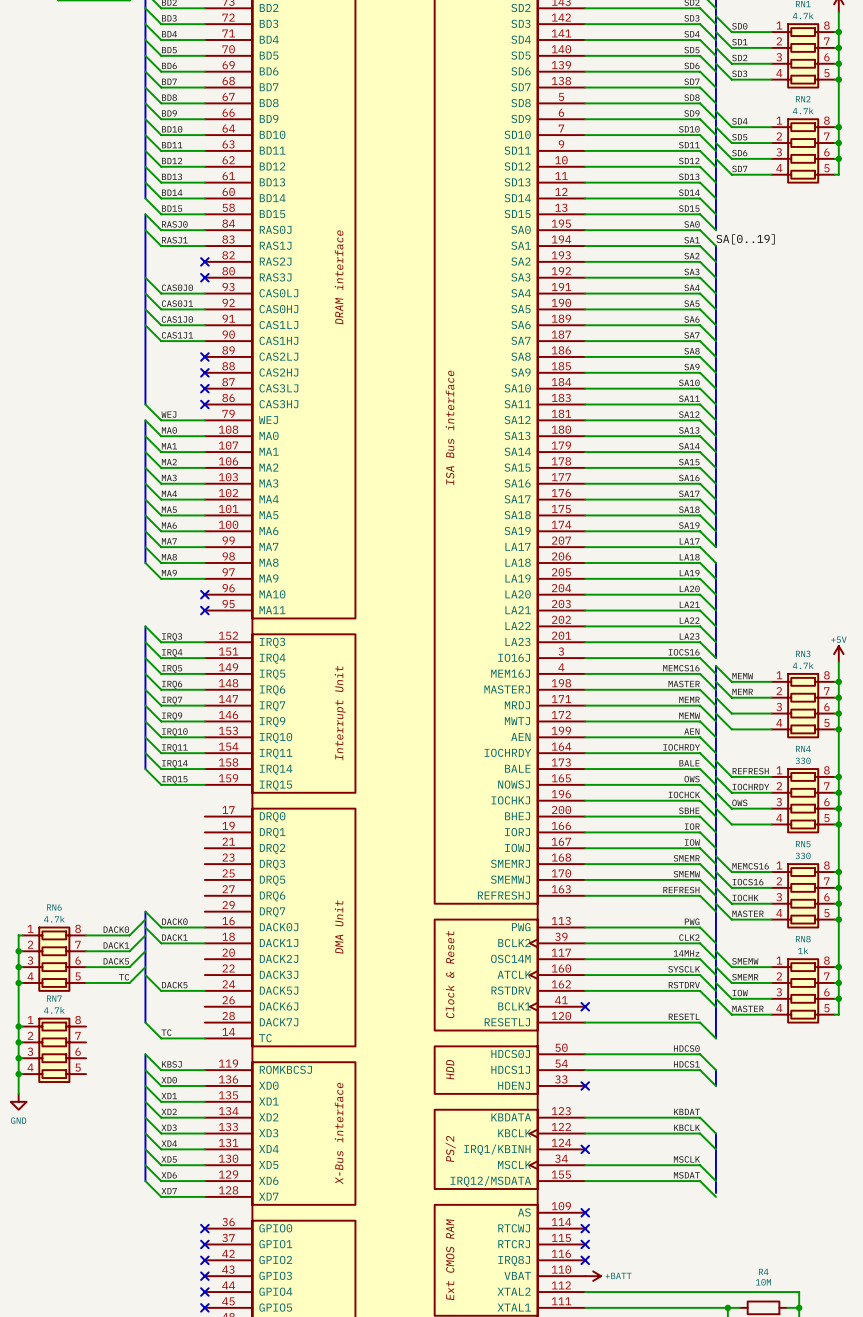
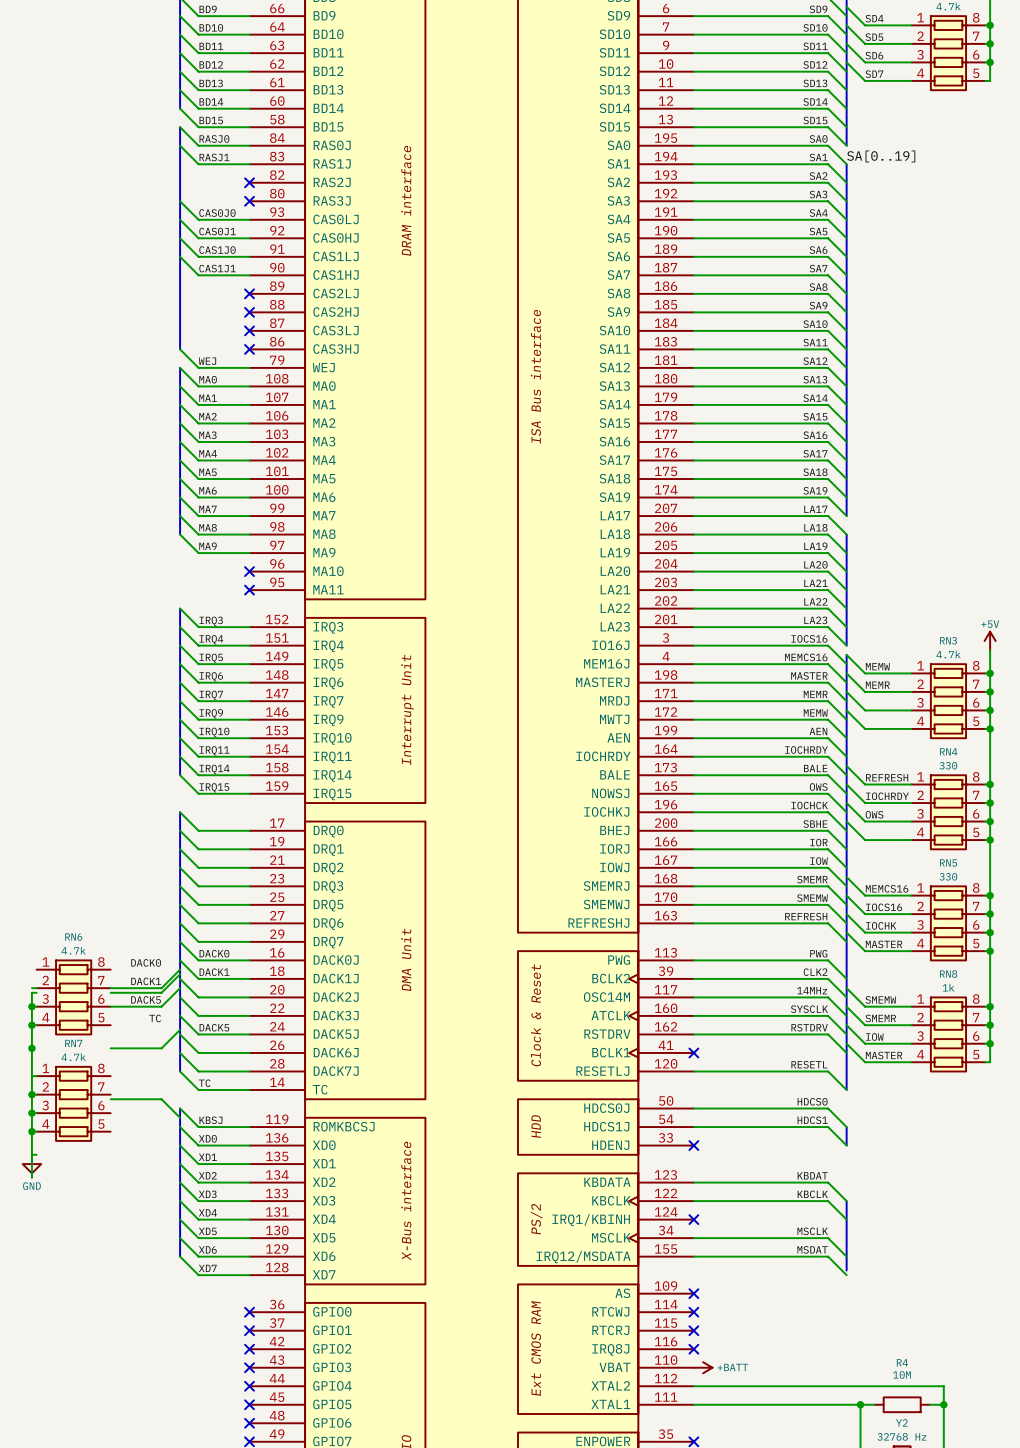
wire: none -> (180, 812) (198, 830) (249, 830)
bus: none -> (180, 812) (180, 941)
wire: none -> (180, 830) (198, 849) (249, 849)
wire: none -> (180, 849) (198, 867) (249, 867)
wire: none -> (180, 867) (198, 886) (249, 886)
wire: none -> (180, 886) (198, 904) (249, 904)
wire: none -> (180, 904) (198, 923) (249, 923)
wire: none -> (180, 923) (198, 941) (249, 941)
wire: (145, 919) (129, 935) (86, 935) -> (180, 974) (161, 992) (110, 992)
wire: (22, 935) (18, 935) (18, 955) -> (36, 992) (31, 992)
wire: none -> (180, 978) (198, 997) (249, 997)
junction: (18, 951) -> none
wire: none -> (180, 997) (198, 1015) (249, 1015)
wire: (145, 967) (129, 982) (86, 982) -> (180, 1029) (161, 1048) (110, 1048)
wire: none -> (180, 1034) (198, 1052) (249, 1052)
wire: none -> (180, 1052) (198, 1071) (249, 1071)
junction position: (18, 1026) -> (31, 1048)
wire: none -> (110, 1099) (161, 1099) (180, 1117)
wire: none -> (36, 1154) (31, 1154) (31, 1177)

